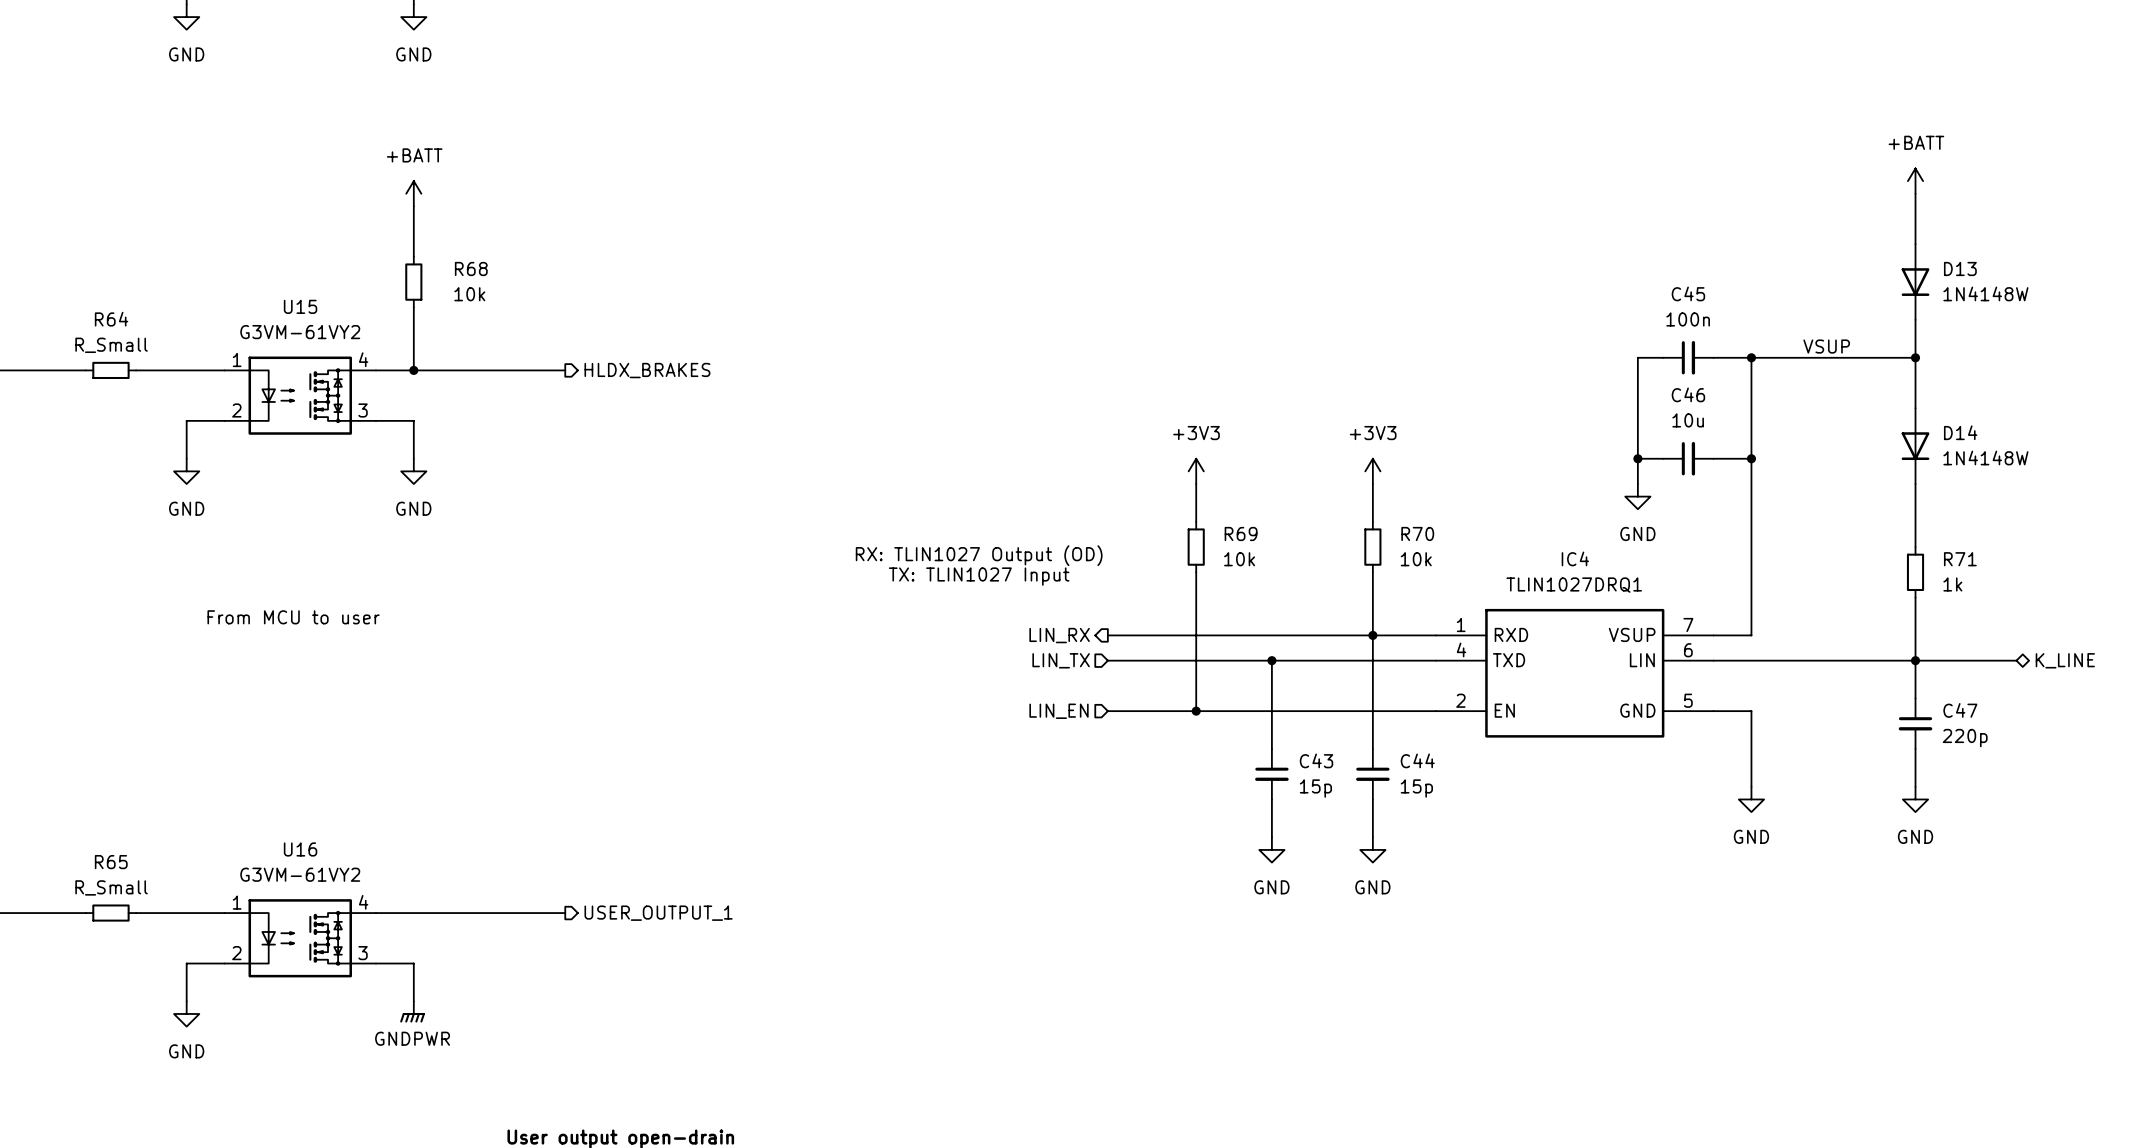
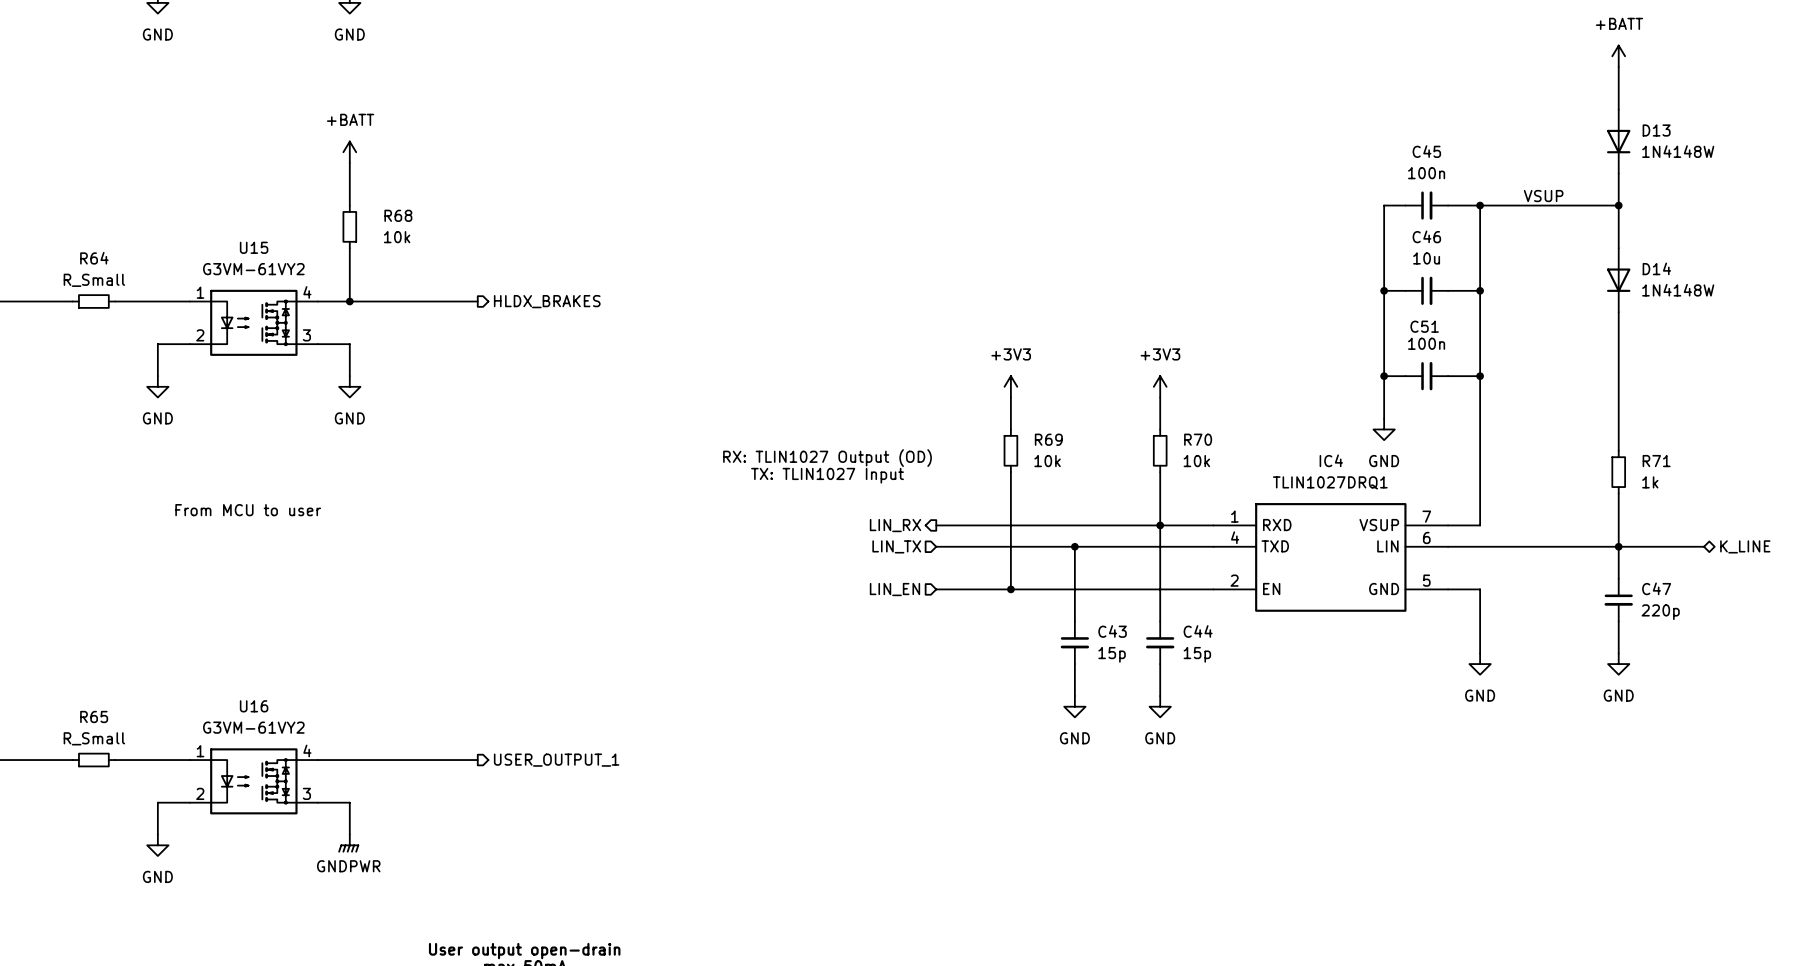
wire: none -> (1618, 66) (1618, 109)
power symbol position: +BATT (1915, 181) -> +BATT (1618, 56)
wire: none -> (1405, 205) (1384, 205) (1384, 290)
C45: none -> 100n (1426, 205)
wire: none -> (1448, 205) (1618, 205)
junction: none -> (1480, 205)
junction: none -> (1618, 205)
D13 position: (1915, 282) -> (1618, 141)
C45 name: C45 (1688, 293) -> C46 (1426, 236)
C45 value: 100n (1688, 319) -> 10u (1426, 258)
label position: VSUP (1826, 346) -> VSUP (1543, 196)
junction: none -> (1384, 290)
wire: (1751, 357) (1915, 357) -> (1480, 290) (1480, 205)
junction: (1915, 357) -> none
C46 name: C46 (1688, 394) -> C51 (1424, 326)
C46 value: 10u (1688, 420) -> 100n (1426, 343)
D14 position: (1915, 446) -> (1618, 280)
power symbol position: GND (1637, 496) -> GND (1384, 429)

